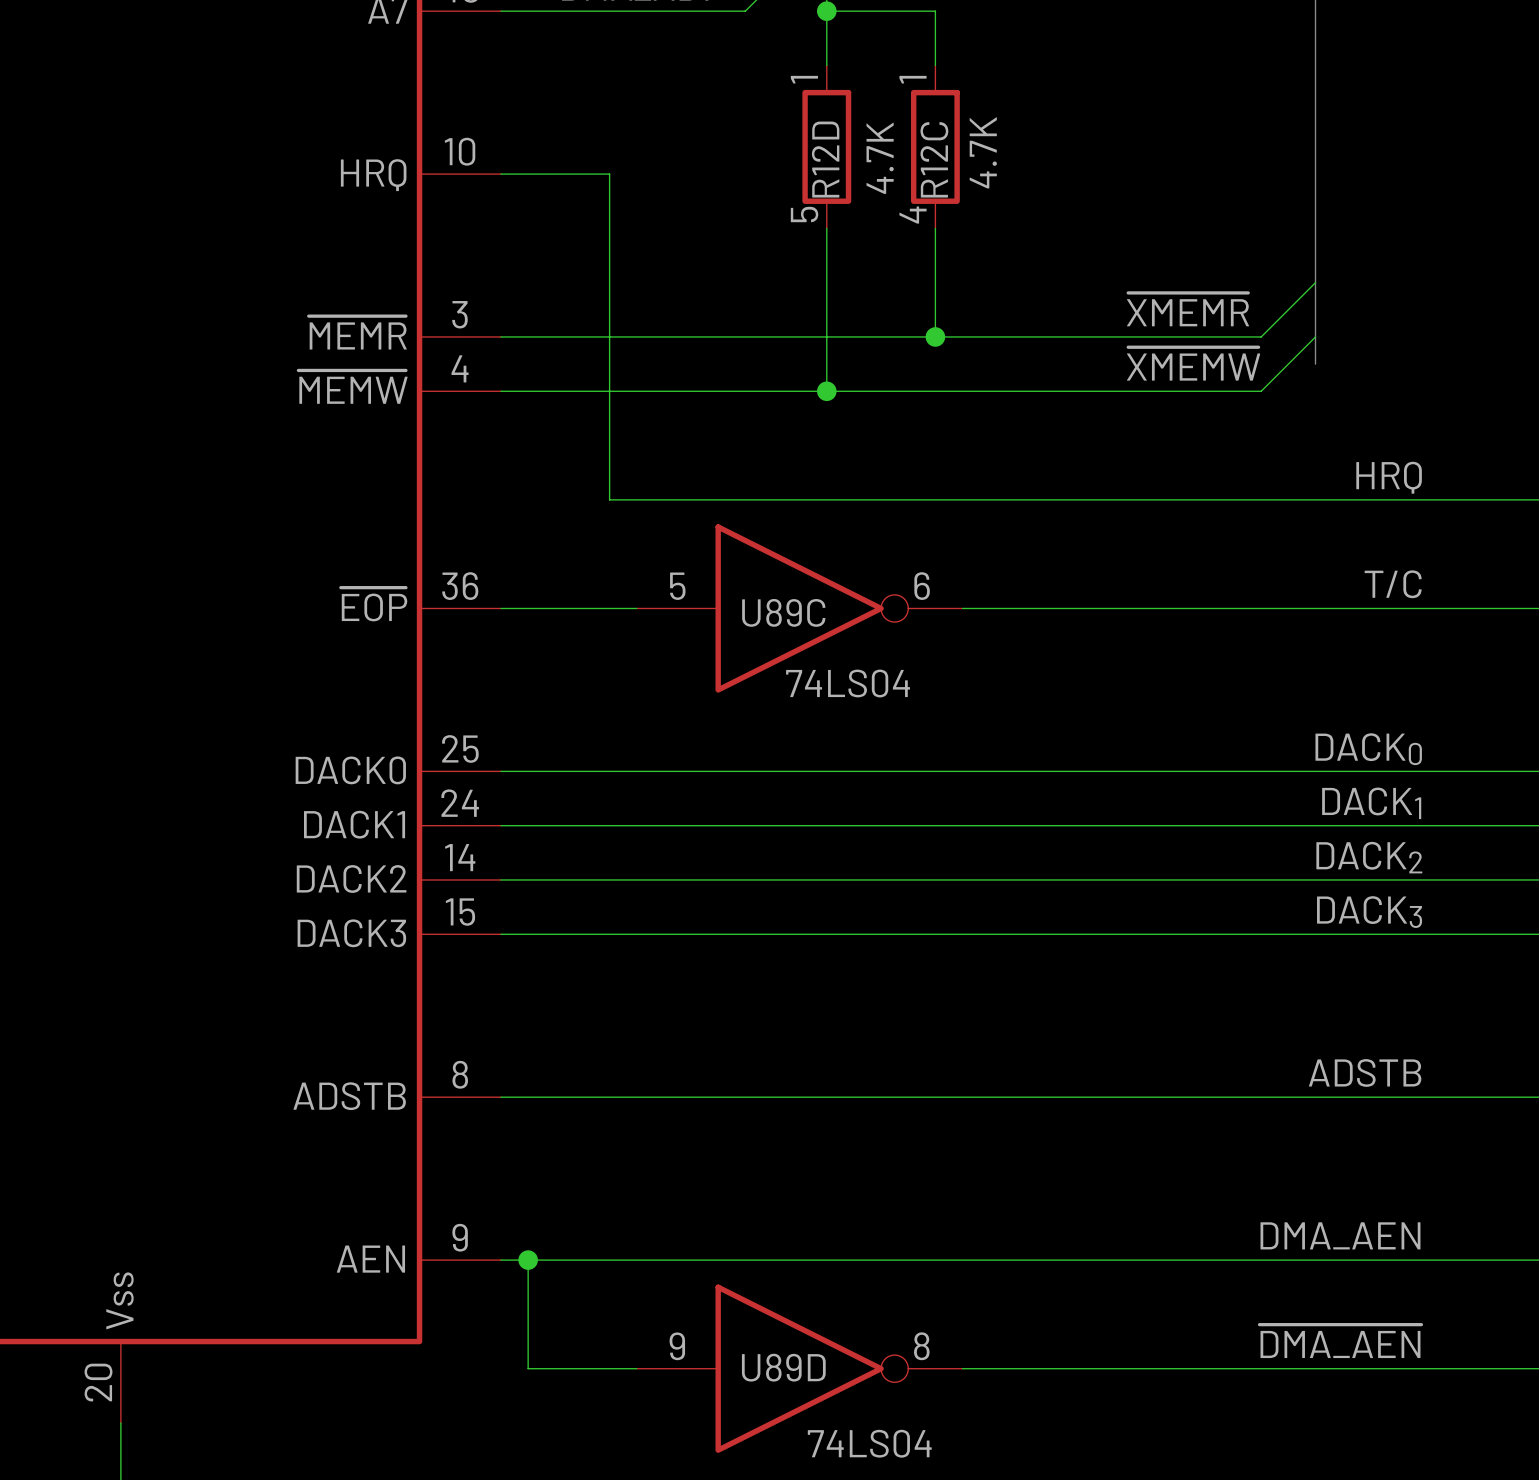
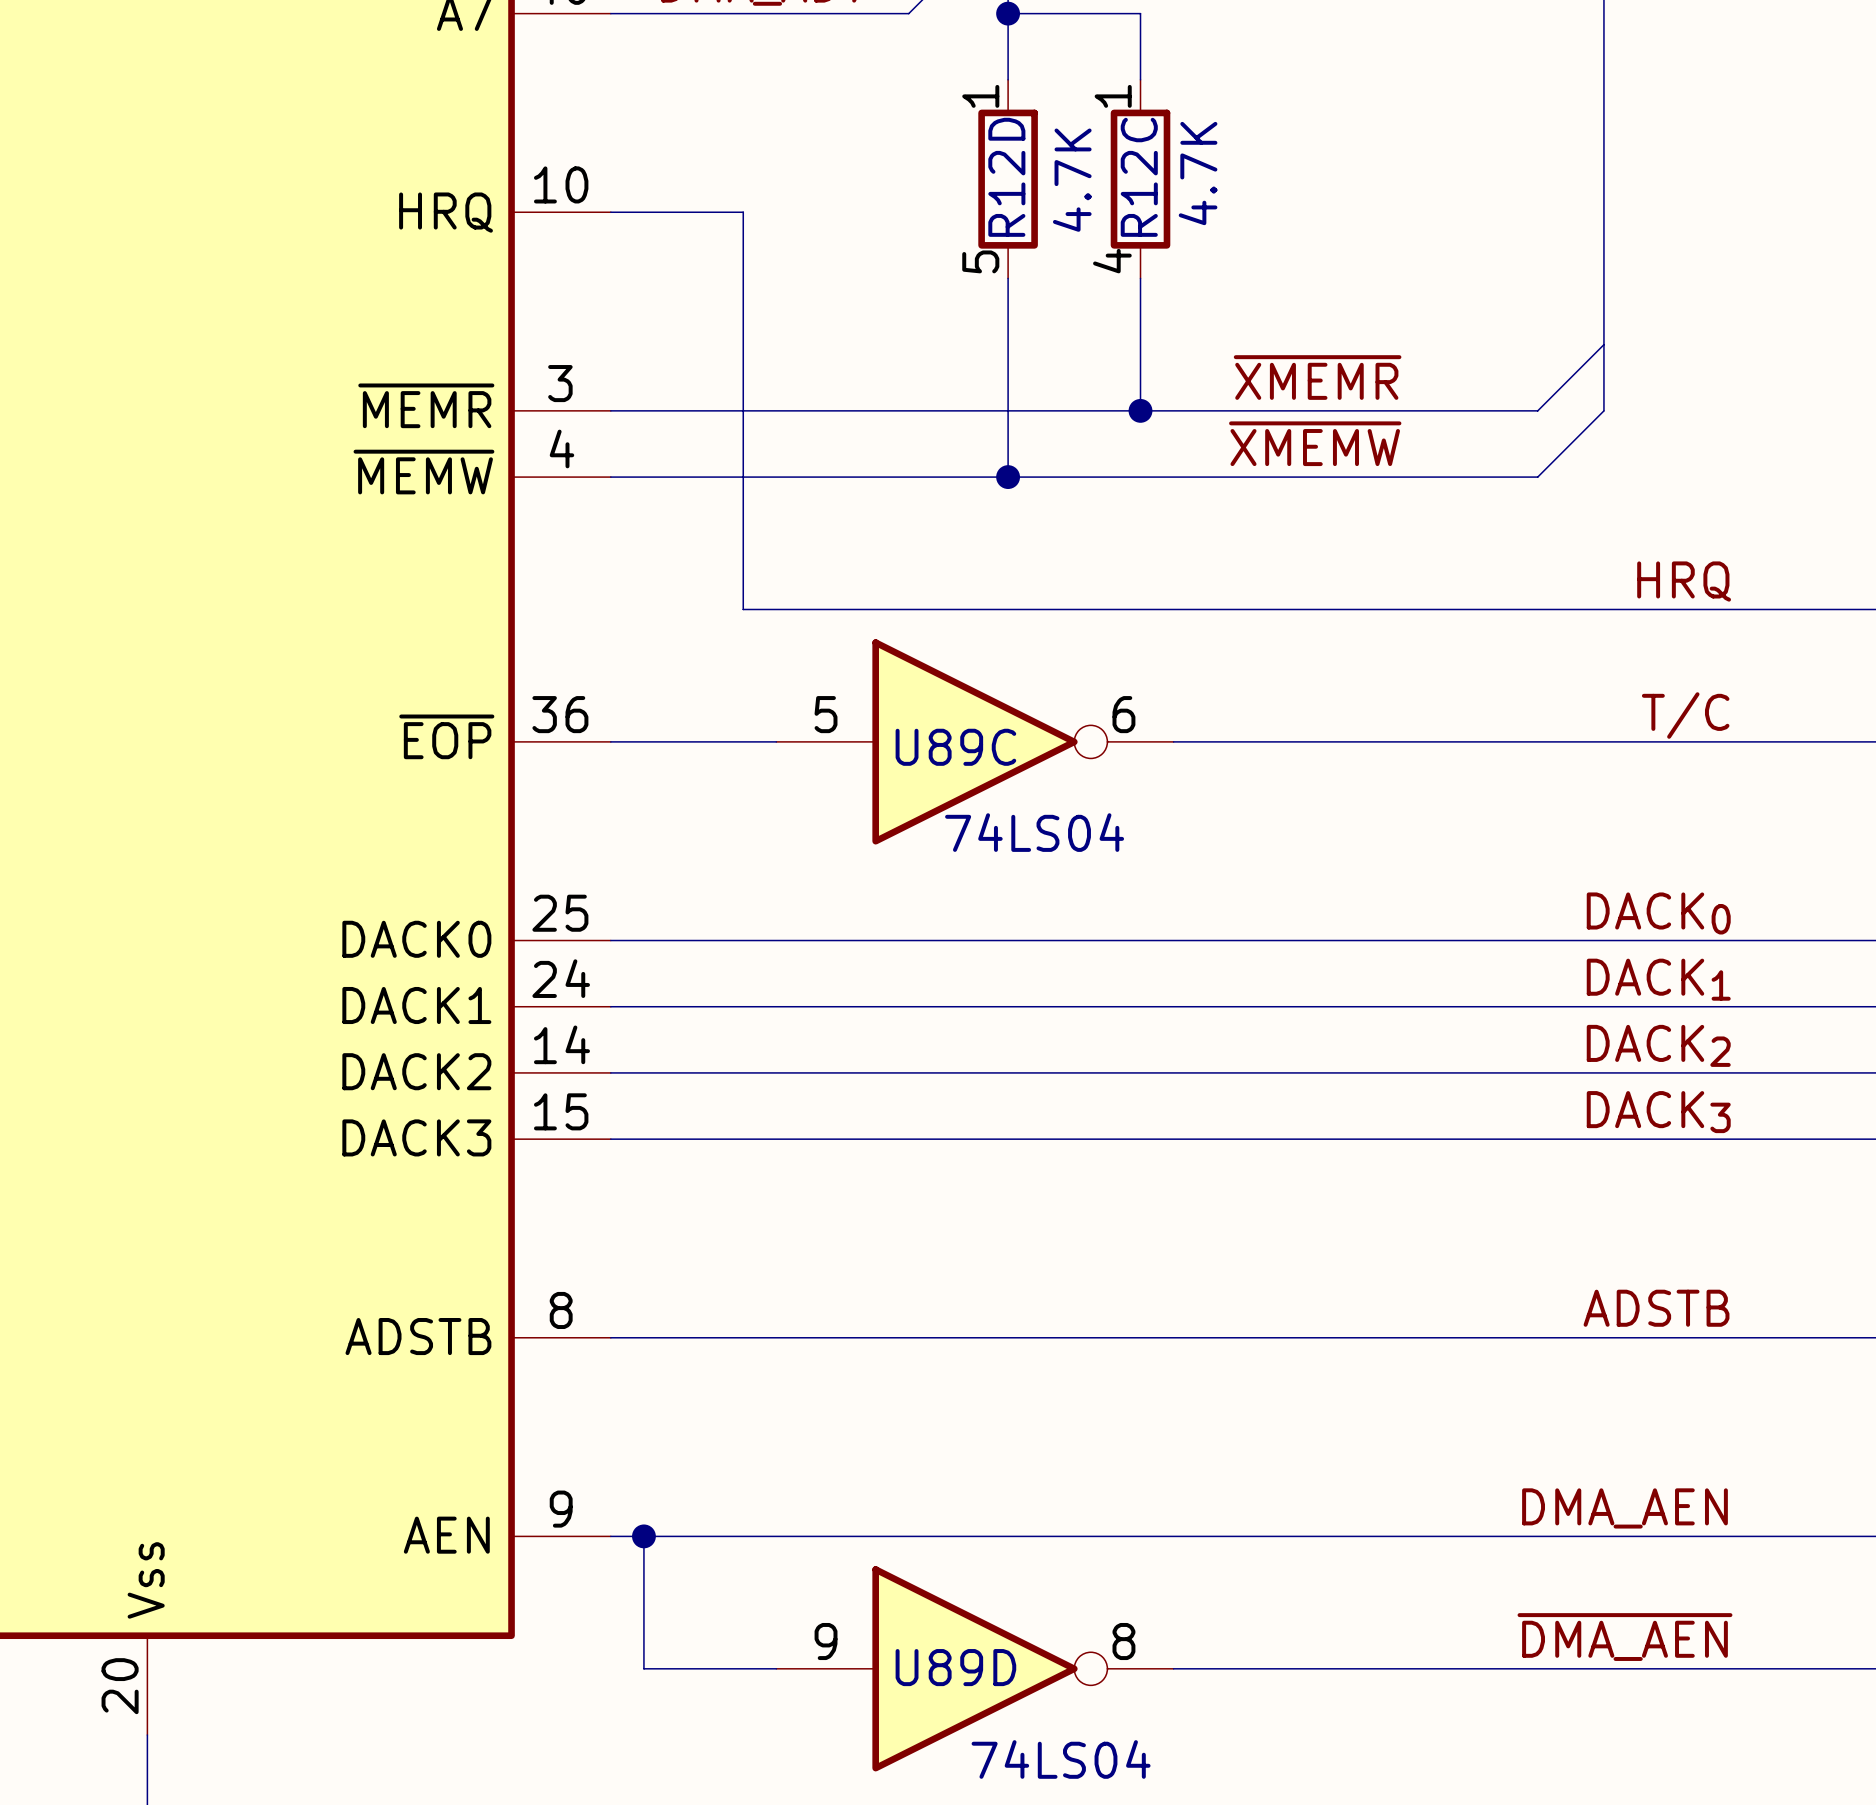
label position: ~{XMEMR} (1187, 309) -> ~{XMEMR} (1317, 377)
bus: (1315, 336) (1315, 364) -> none
label position: ~{XMEMW} (1193, 363) -> ~{XMEMW} (1315, 443)

